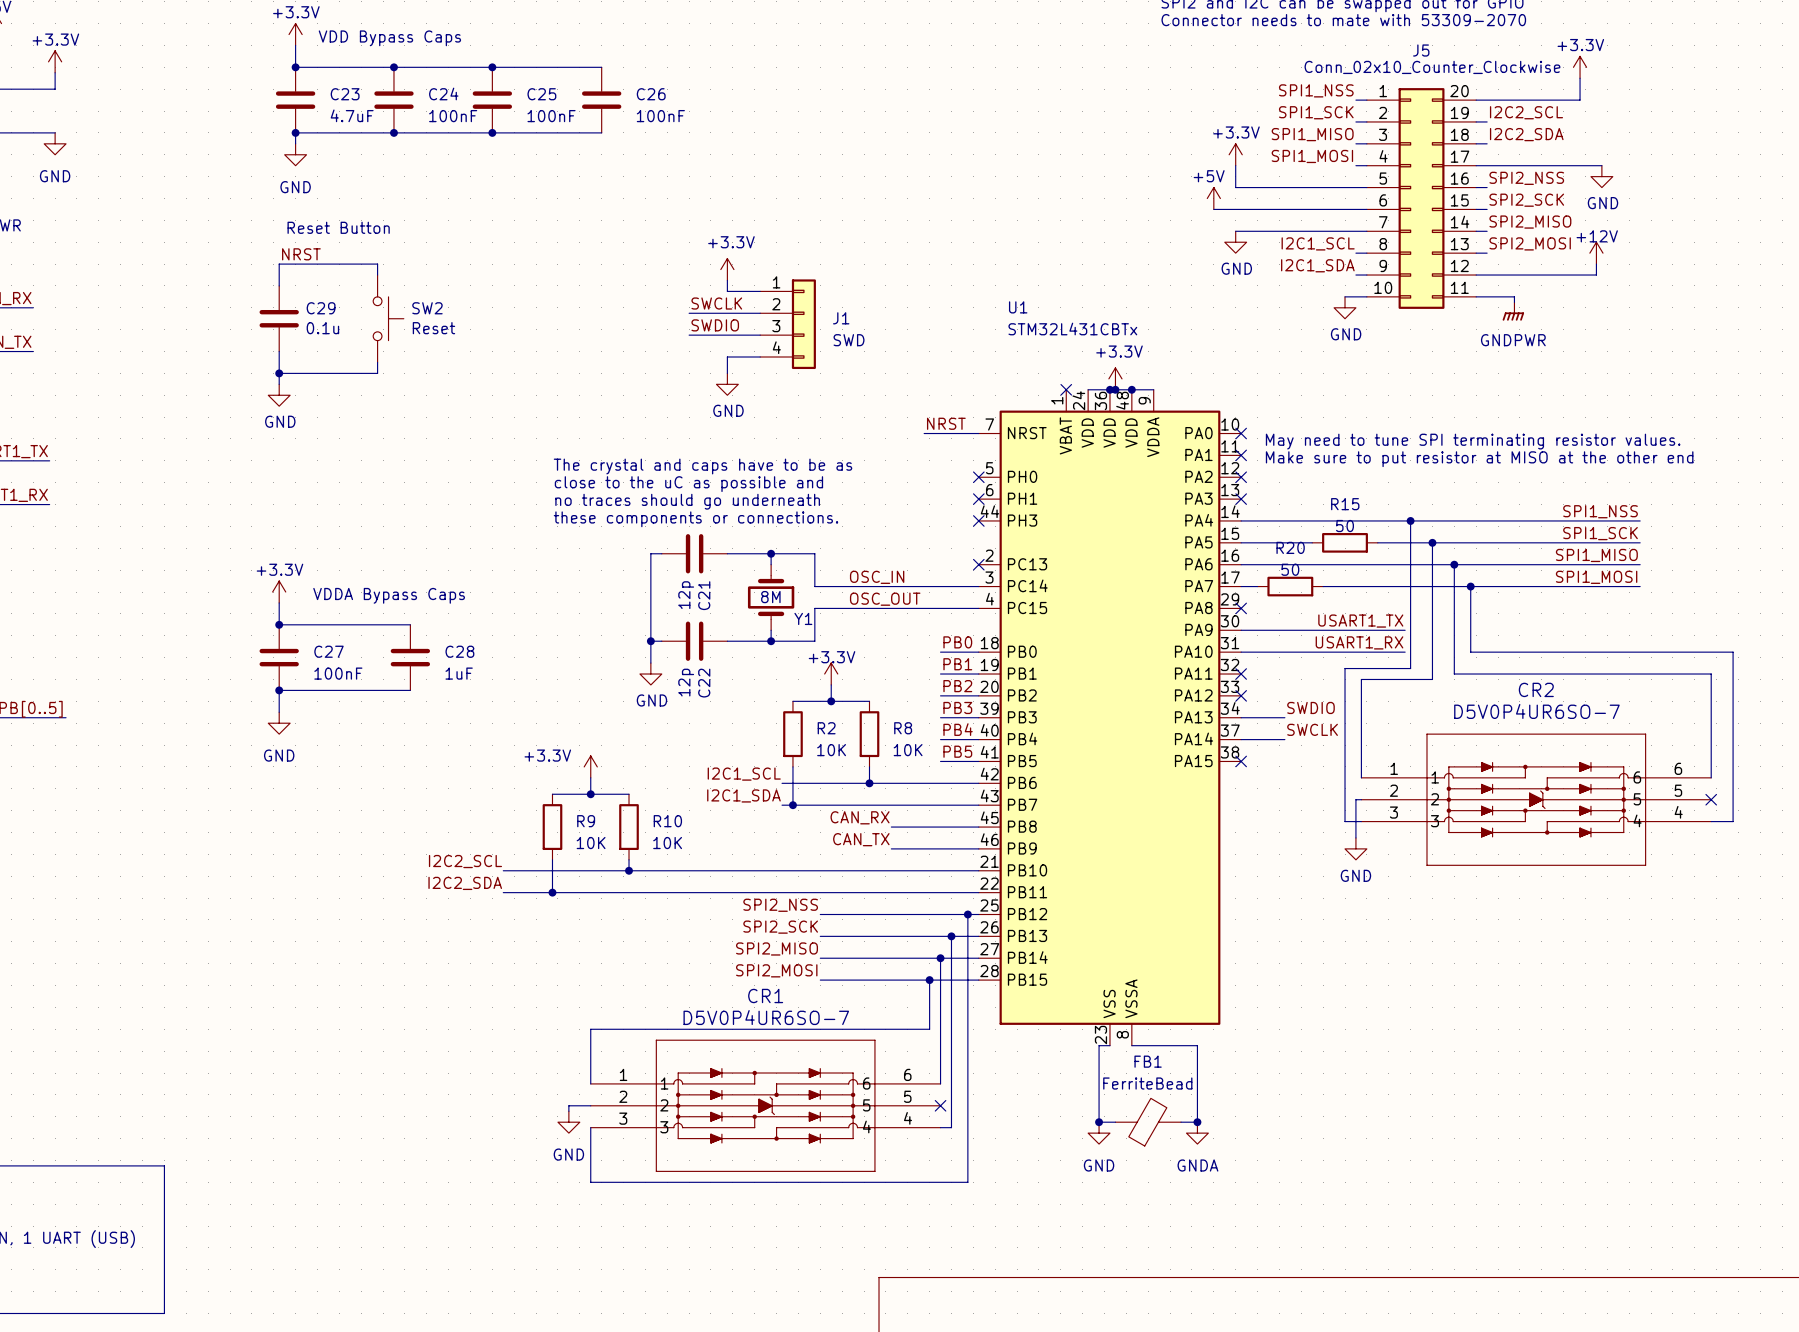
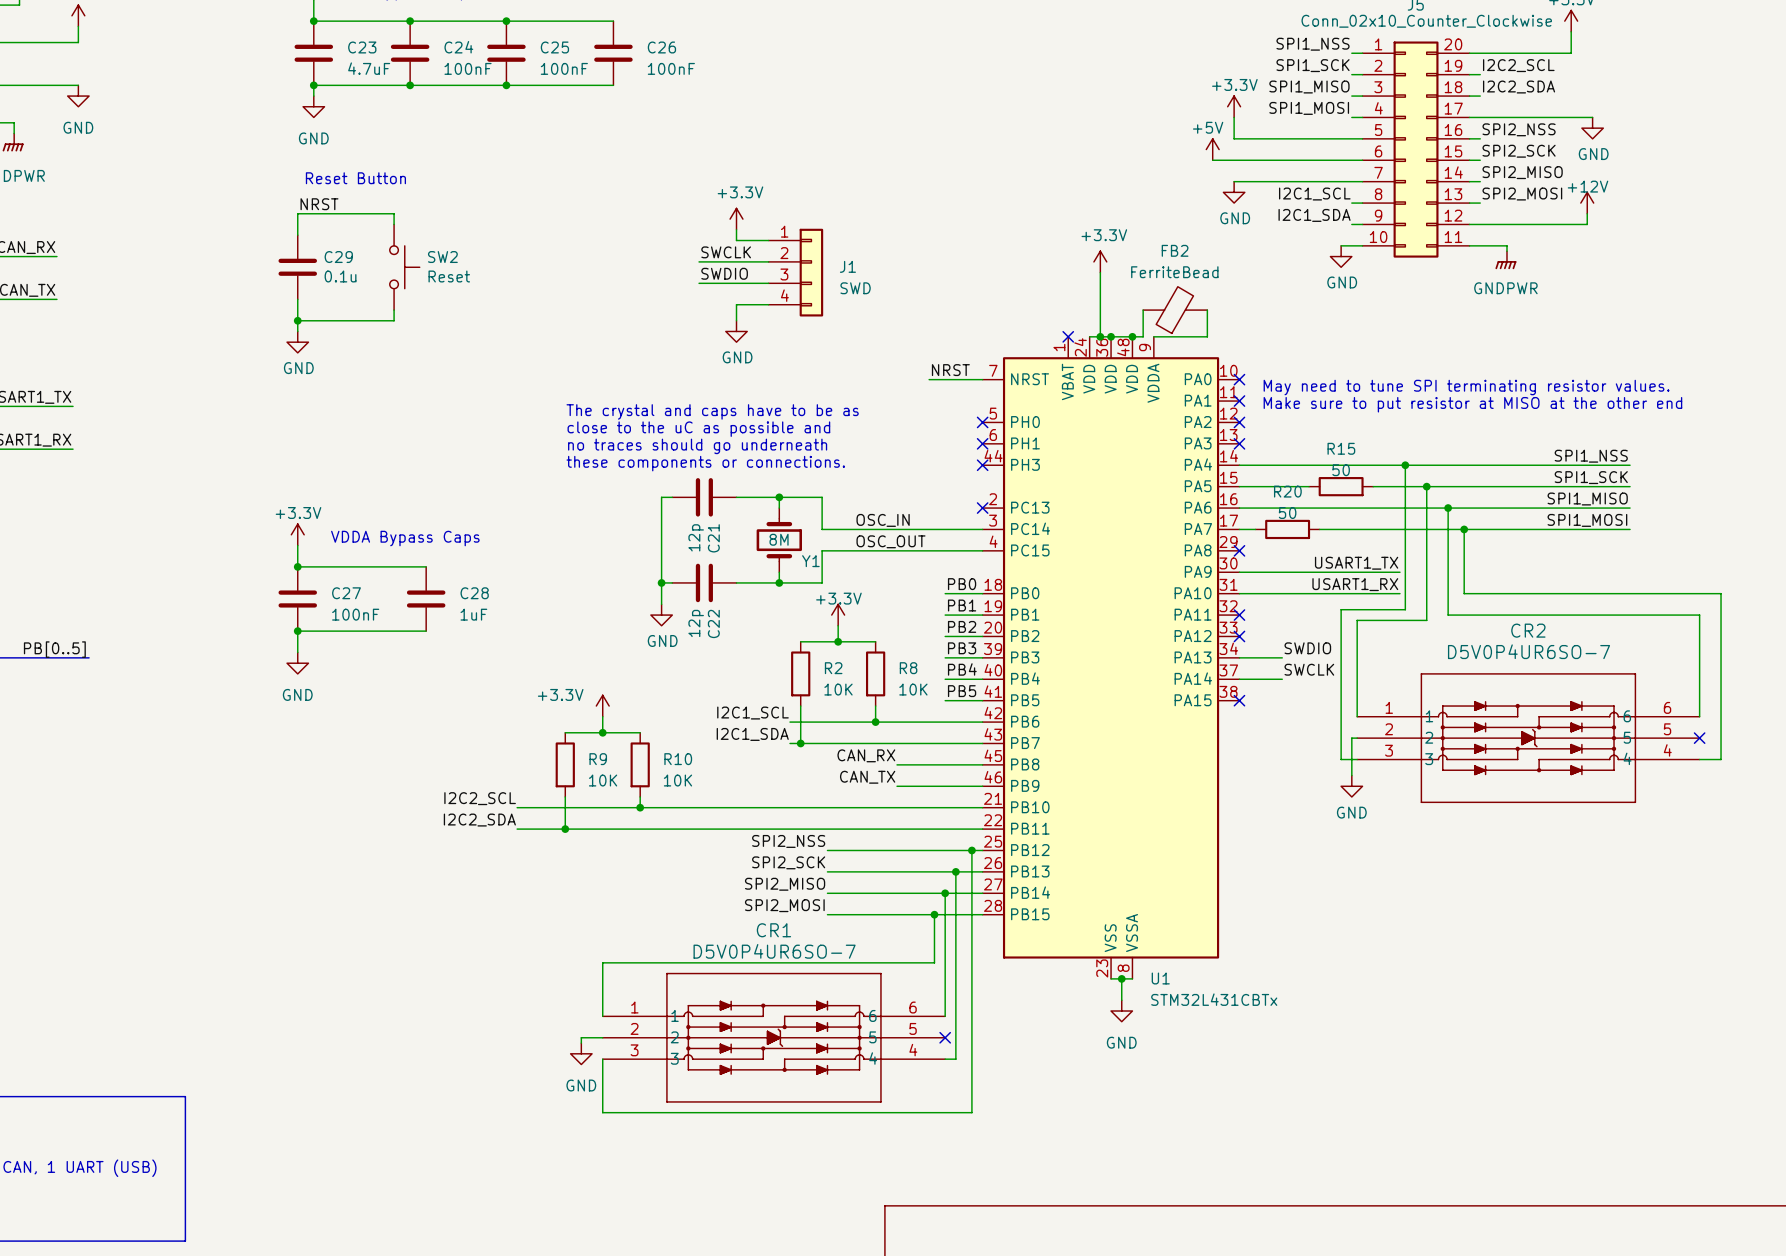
U1 name position: U1 (1018, 307) -> U1 (1160, 978)
wire: none -> (1100, 272) (1100, 336)
U1 value position: STM32L431CBTx (1072, 329) -> STM32L431CBTx (1214, 999)
FB2: none -> FerriteBead (1175, 310)
wire: none -> (1207, 310) (1207, 336) (1153, 336)
power symbol position: +3.3V (1115, 378) -> +3.3V (1100, 261)
junction position: (1115, 389) -> (1100, 336)
wire: (1142, 389) (1153, 389) -> (1143, 336) (1143, 310)
wire: (1109, 1045) (1099, 1045) (1099, 1122) (1115, 1122) -> (1111, 978) (1132, 978)
wire: none -> (1121, 978) (1121, 1000)
junction: none -> (1121, 978)
wire: (1131, 1045) (1197, 1045) (1197, 1122) (1181, 1122) -> none
junction: (1099, 1122) -> none
FB1: FerriteBead (1148, 1122) -> none
junction: (1197, 1122) -> none
power symbol position: GND (1099, 1133) -> GND (1121, 1011)
power symbol: GNDA (1197, 1133) -> none

